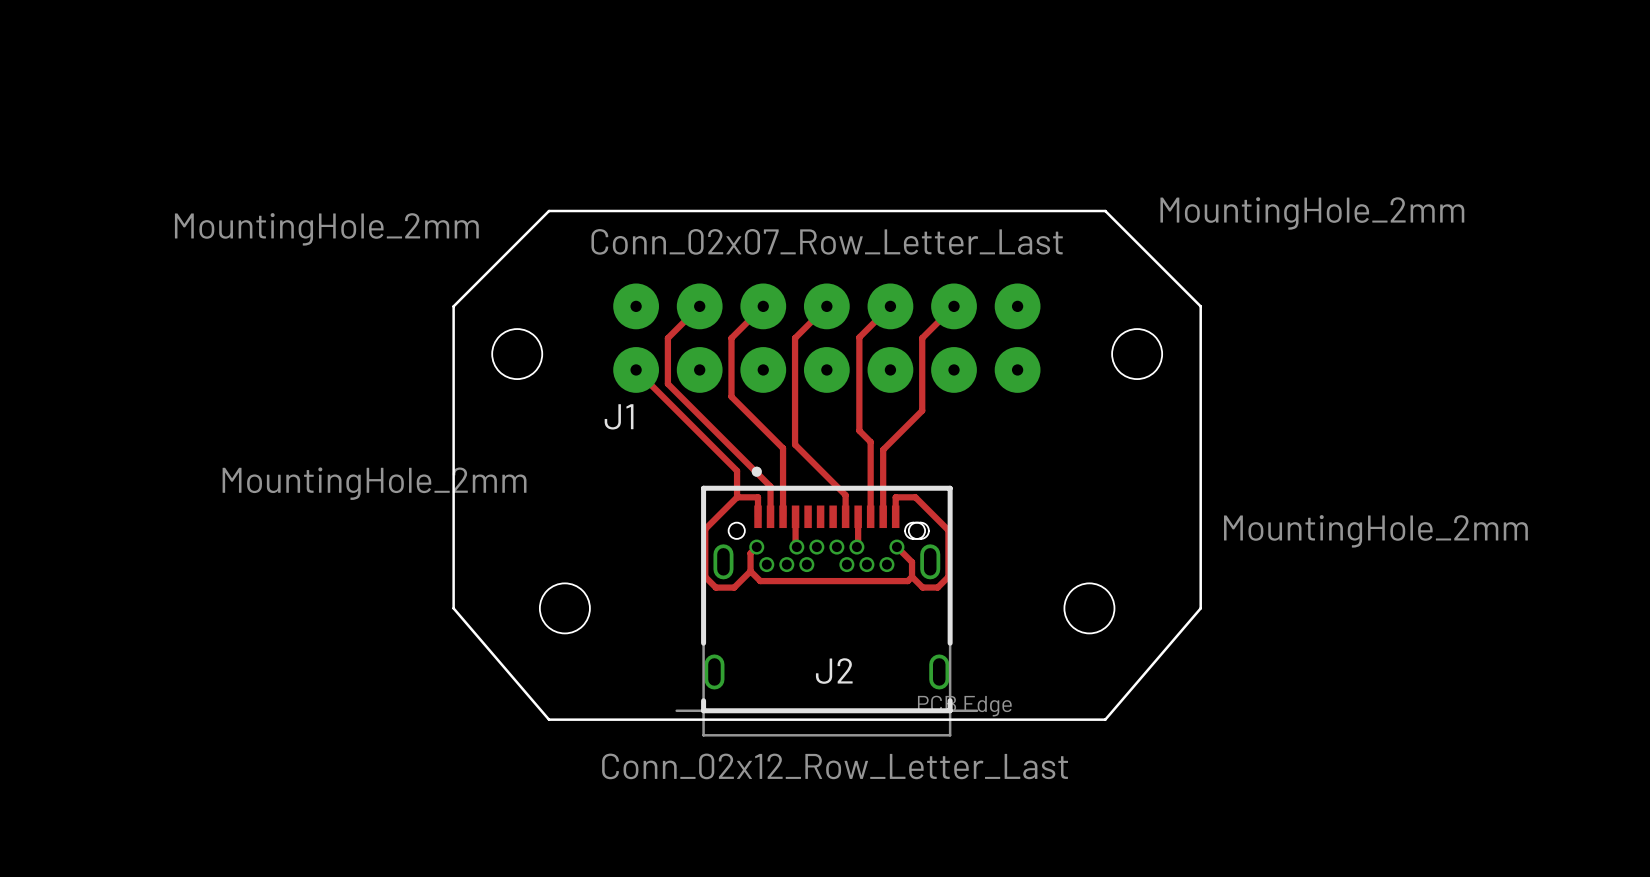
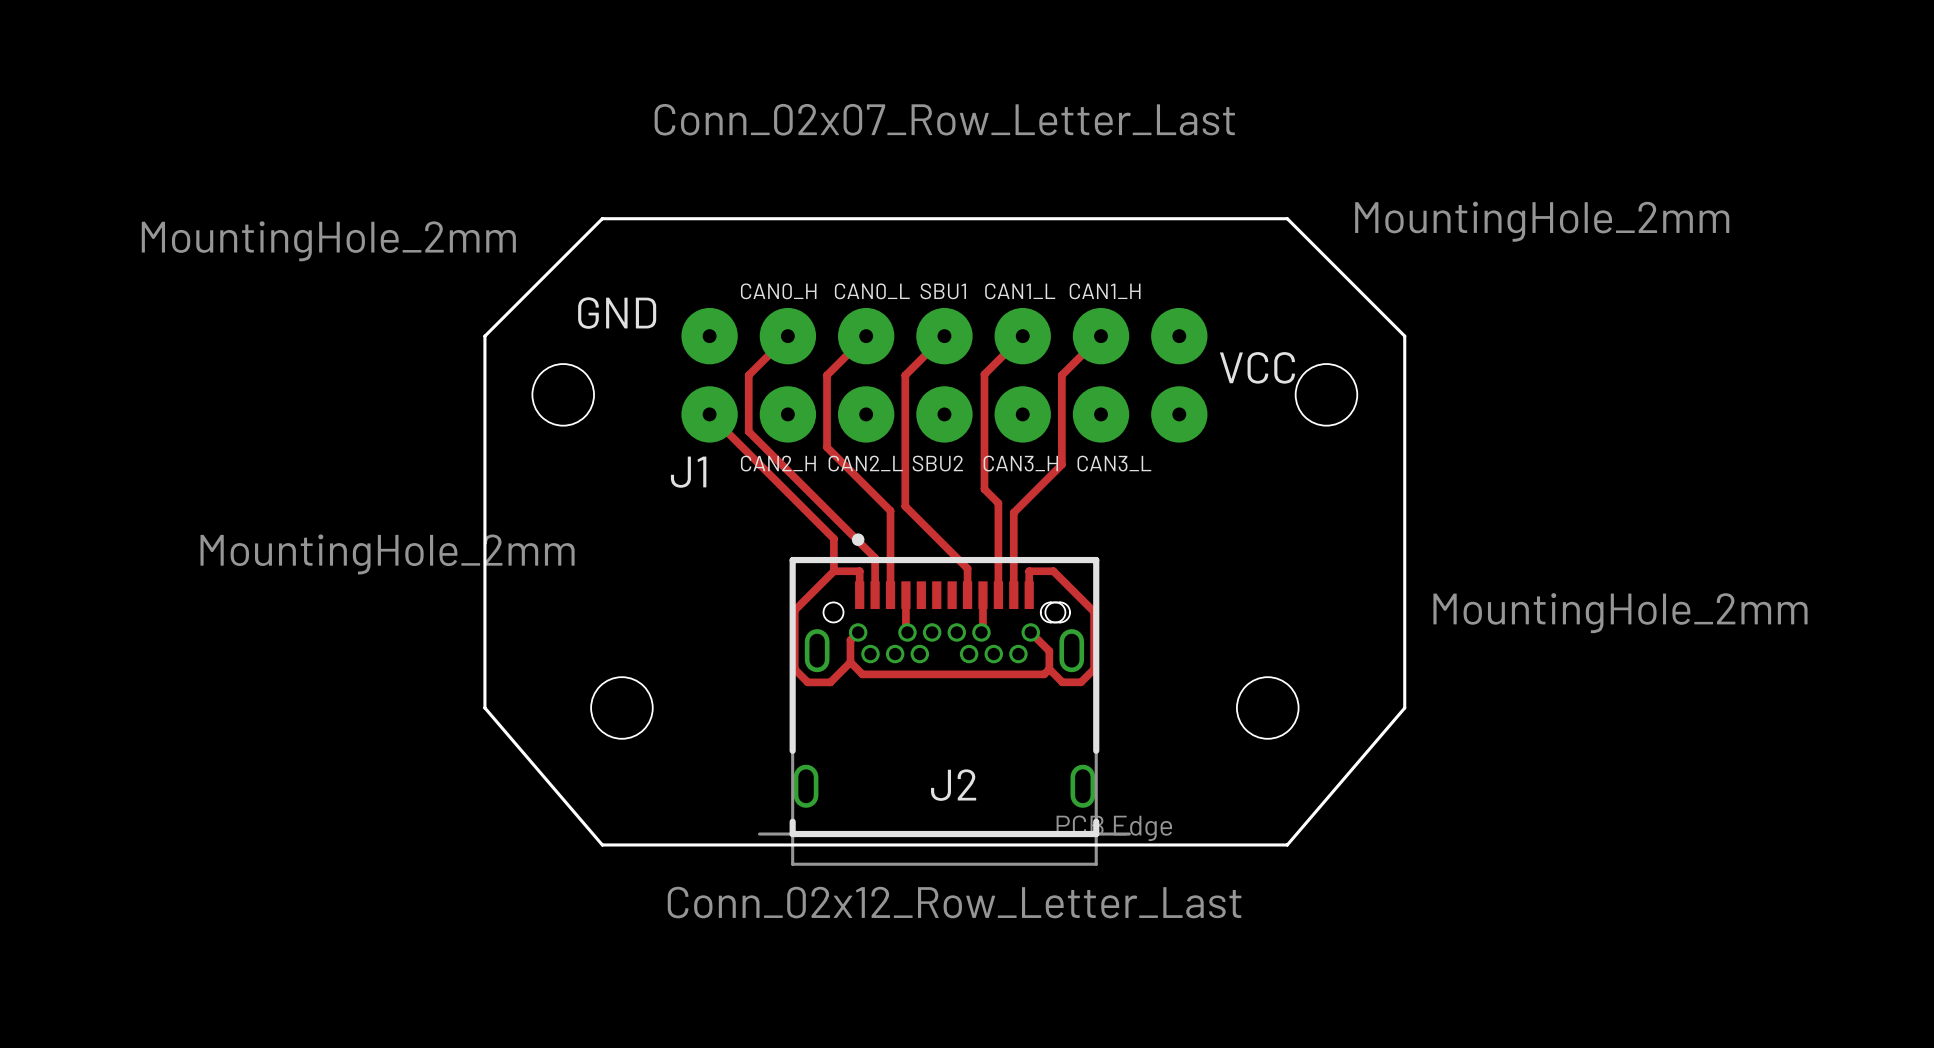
J1 value position: Conn_02x07_Row_Letter_Last (827, 241) -> Conn_02x07_Row_Letter_Last (944, 119)
J1 footprint: [613, 283, 1041, 393] -> [681, 307, 1208, 443]

